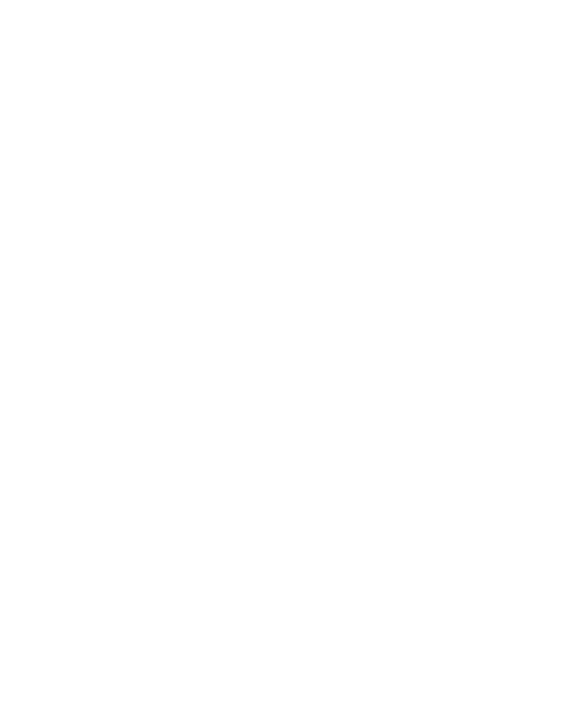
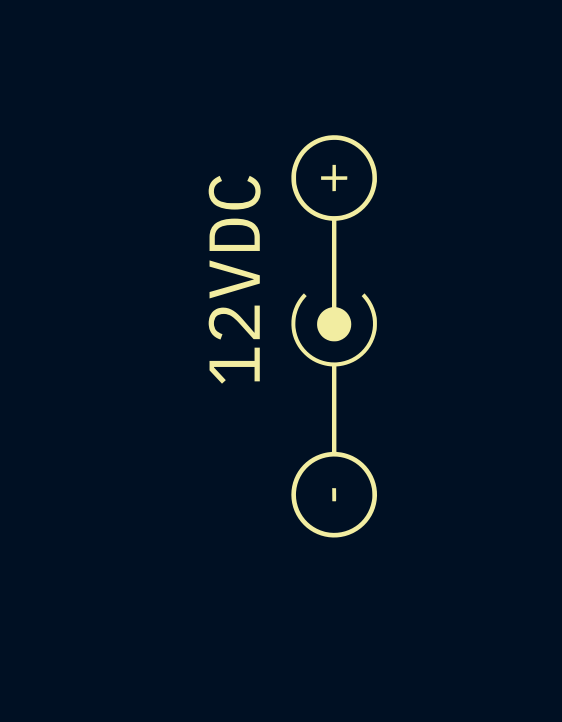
drawing: none -> [291, 135, 378, 538]
text: none -> 12VDC (234, 279)

